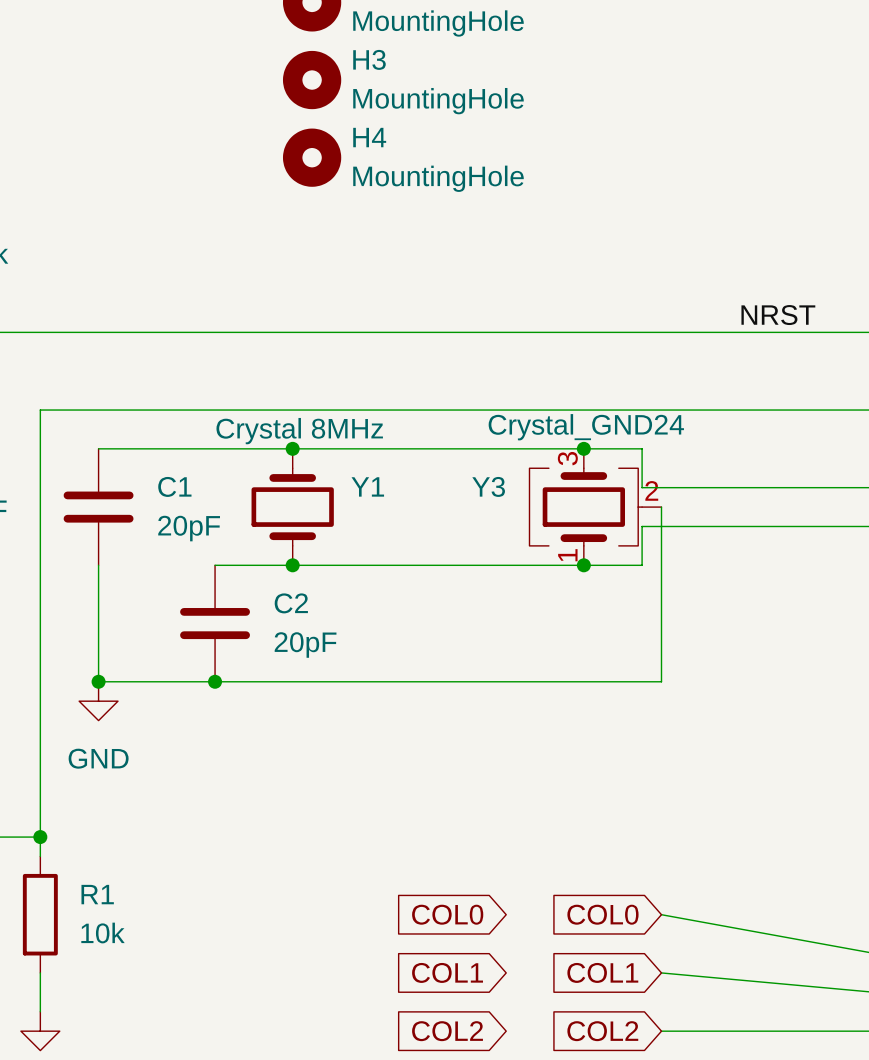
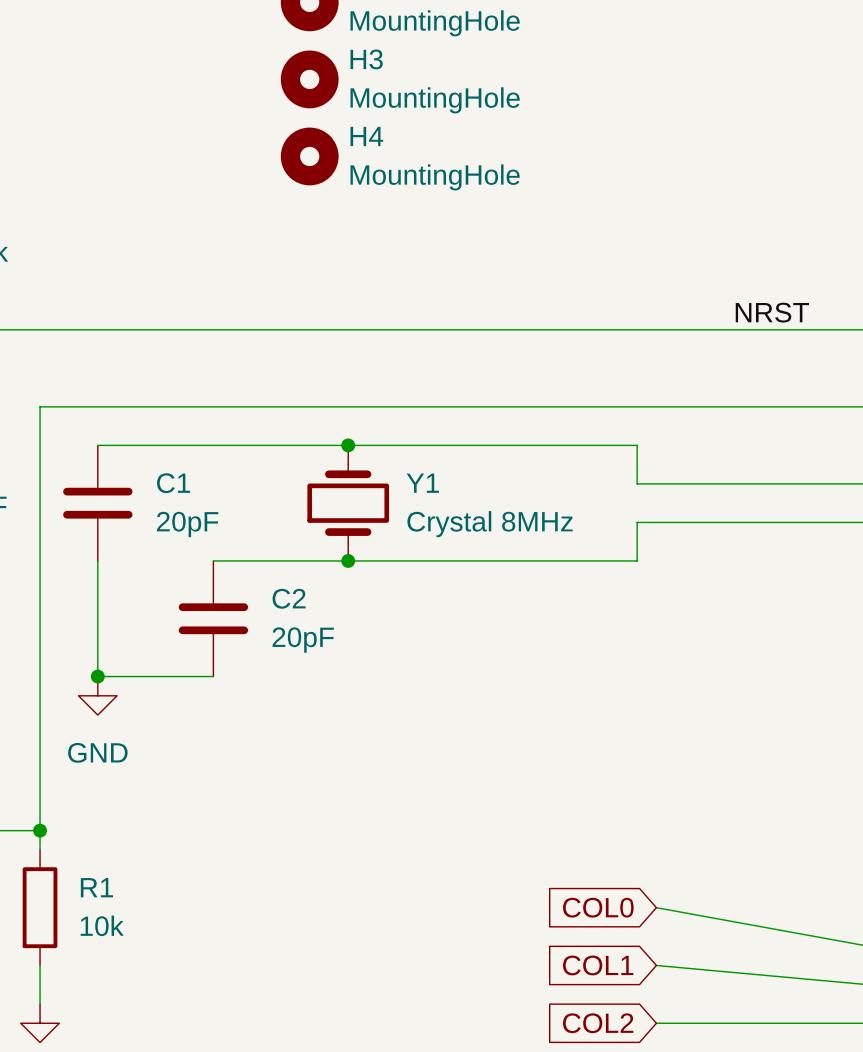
Y1 value position: Crystal 8MHz (299, 431) -> Crystal 8MHz (490, 524)
junction position: (292, 448) -> (348, 445)
junction: (583, 448) -> none
Y1 position: (292, 507) -> (348, 503)
Y3: Crystal_GND24 (595, 507) -> none
wire: (661, 507) (661, 681) (215, 681) -> none
junction position: (292, 565) -> (348, 560)
junction: (583, 565) -> none
junction: (215, 681) -> none
global label: COL0 (447, 914) -> none
global label: COL1 (447, 972) -> none
global label: COL2 (447, 1031) -> none

